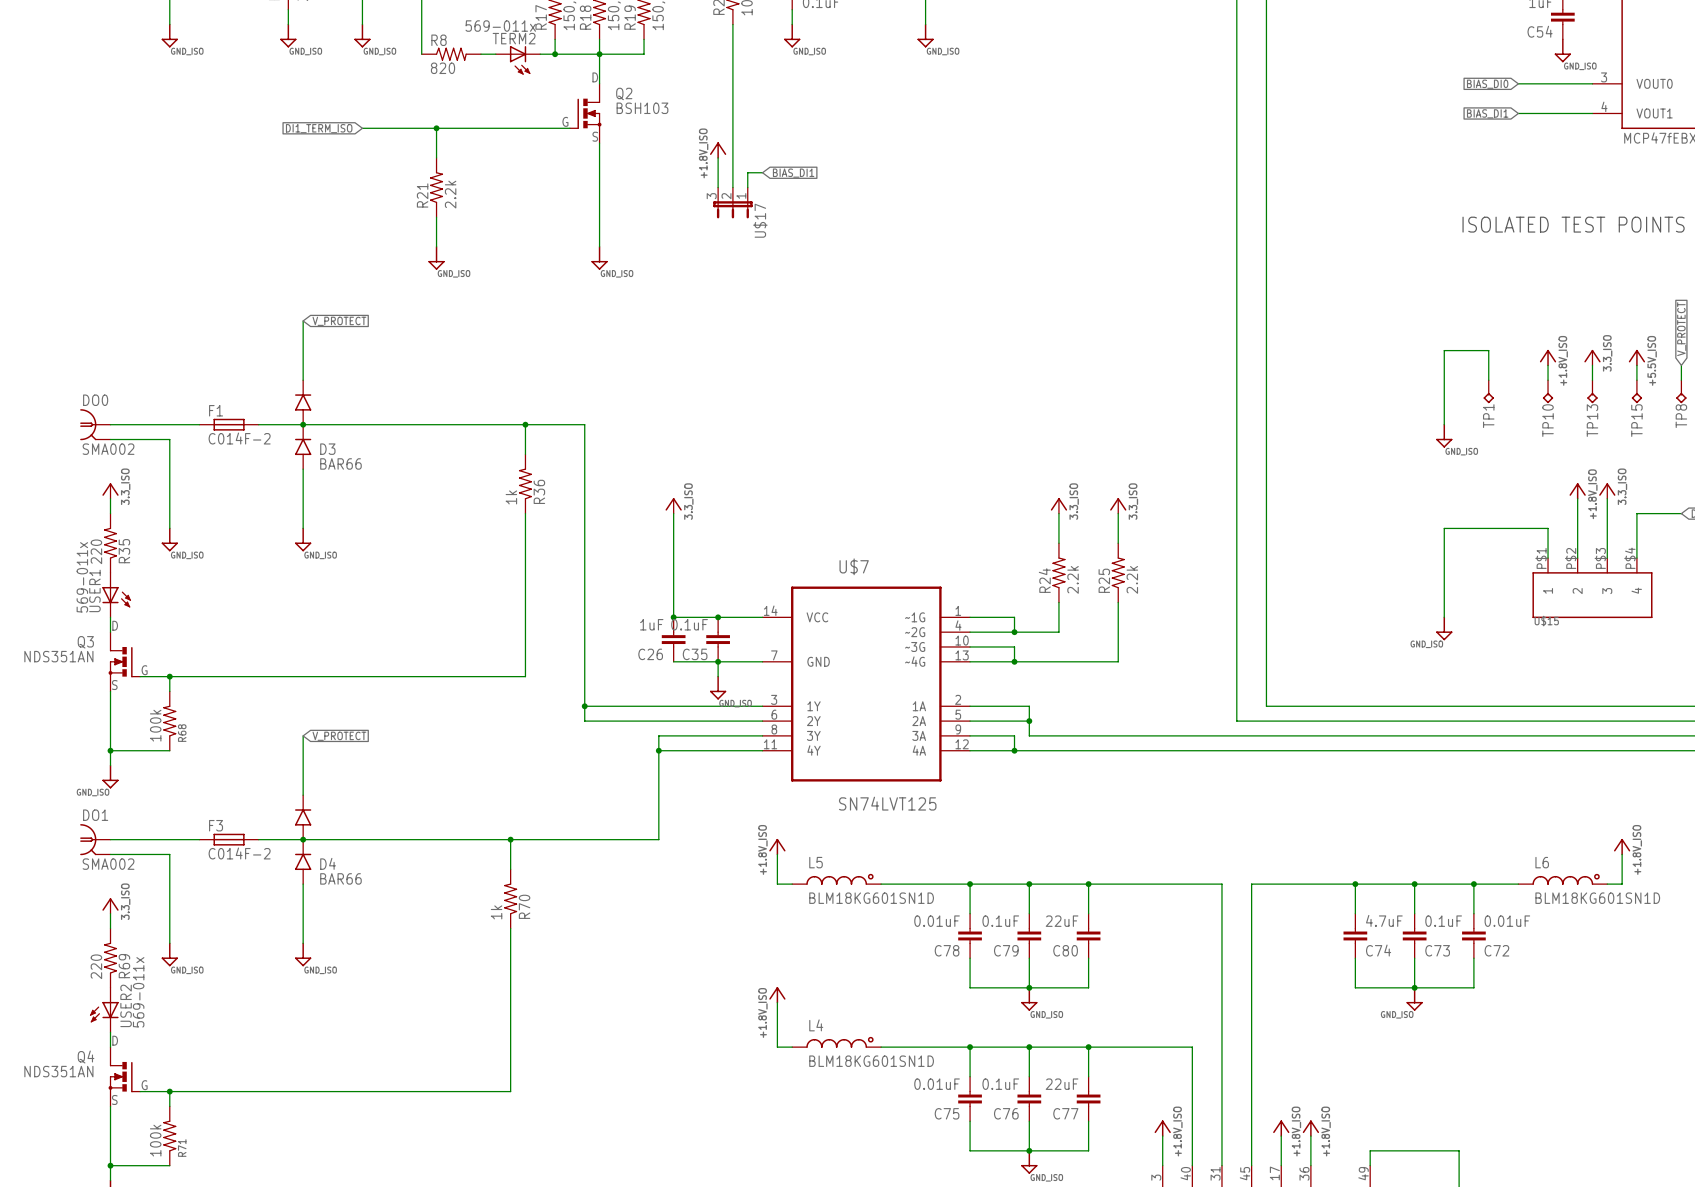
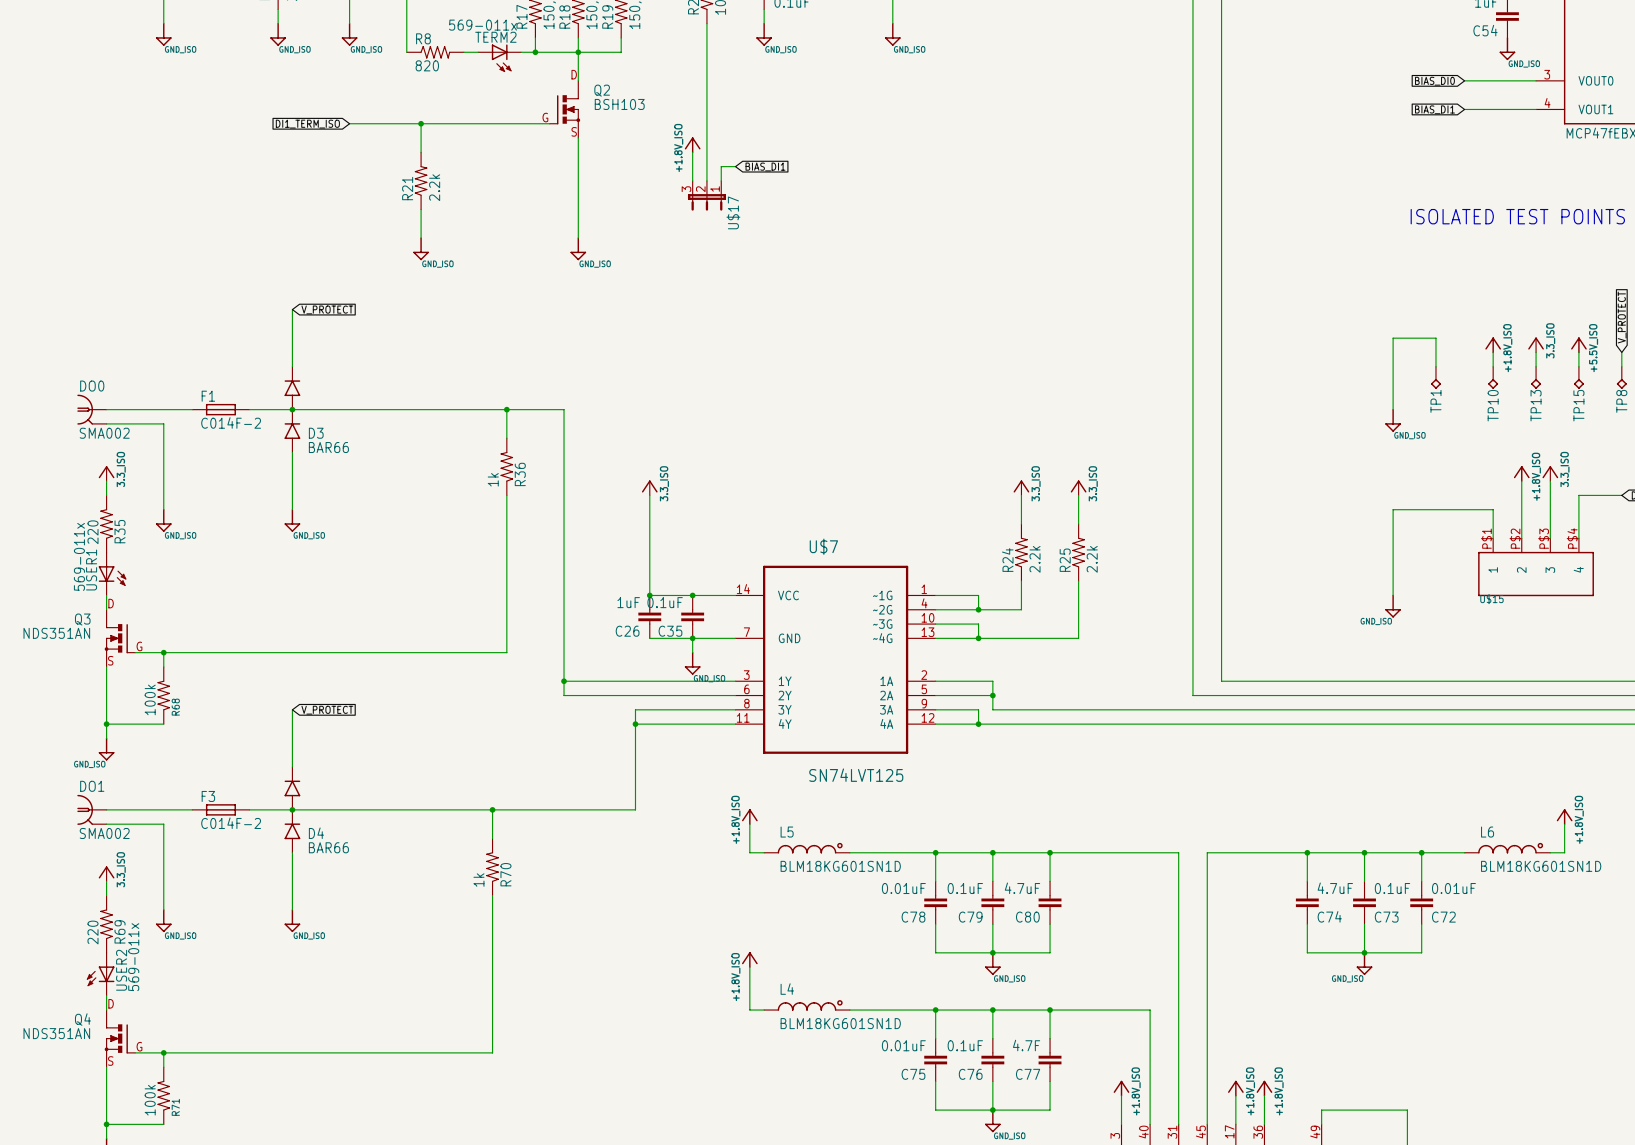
C80 value: 22uF (1062, 921) -> 4.7uF (1022, 888)
C77 value: 22uF (1062, 1084) -> 4.7F (1026, 1045)

